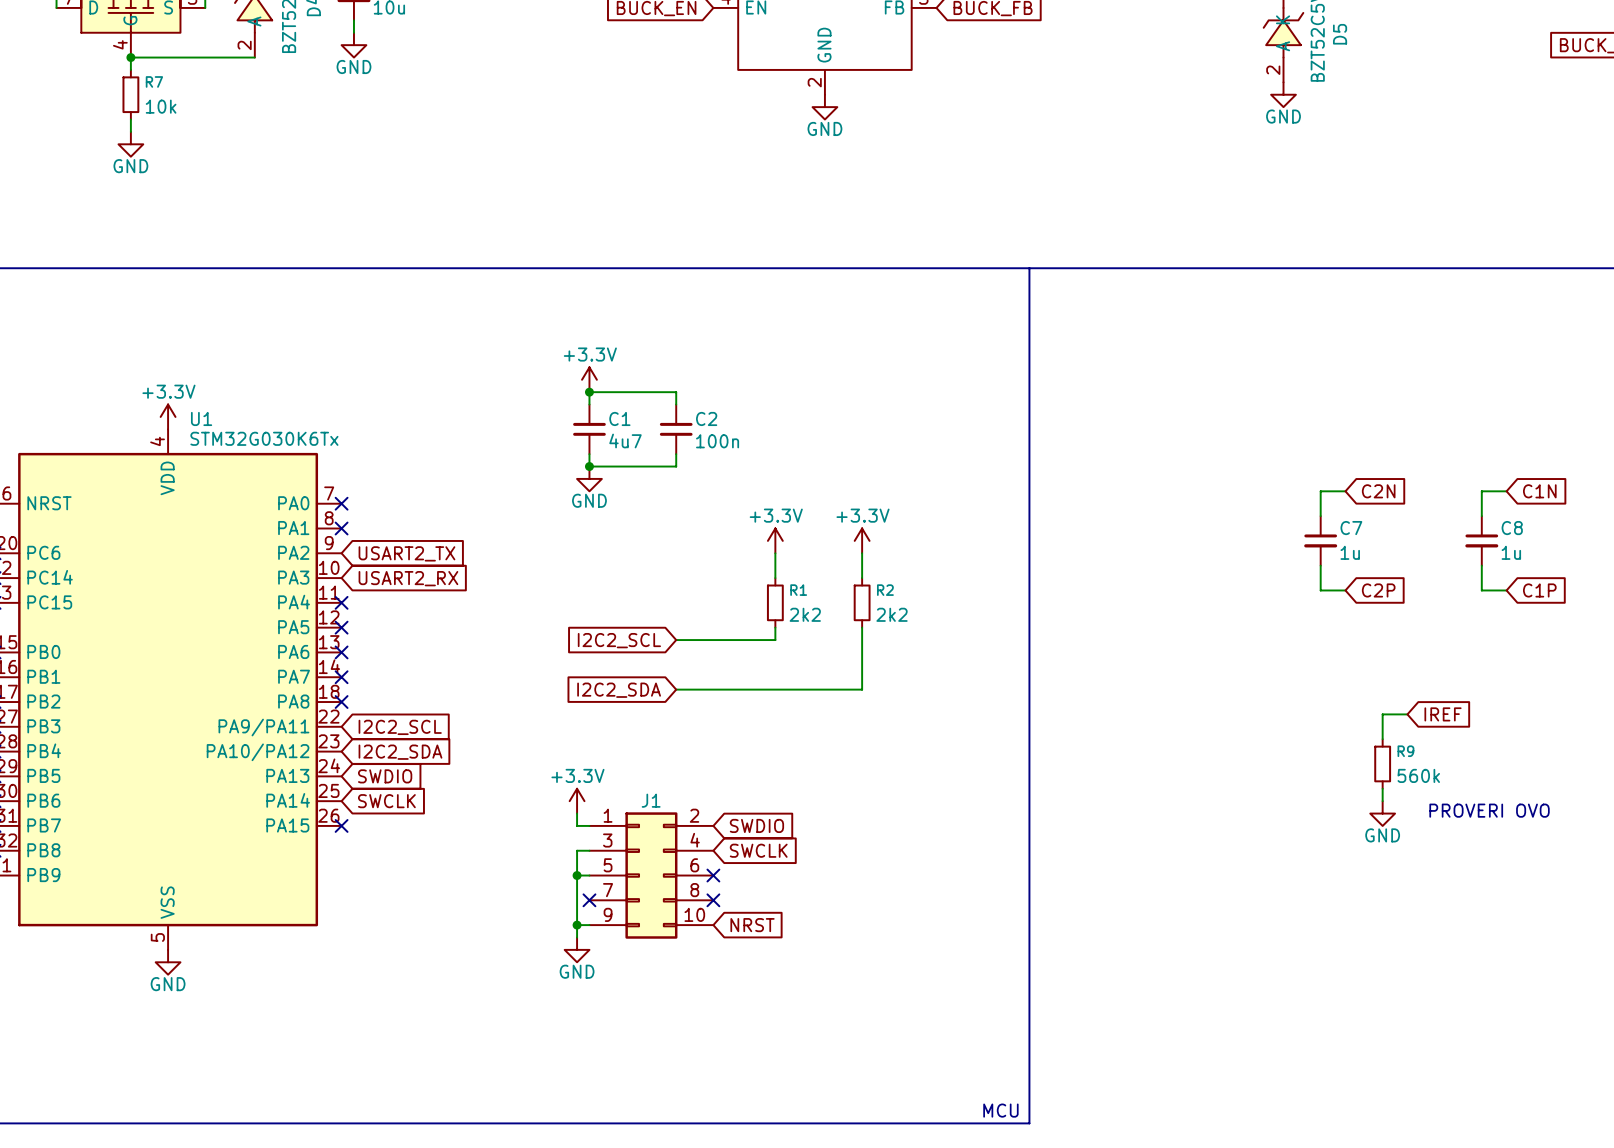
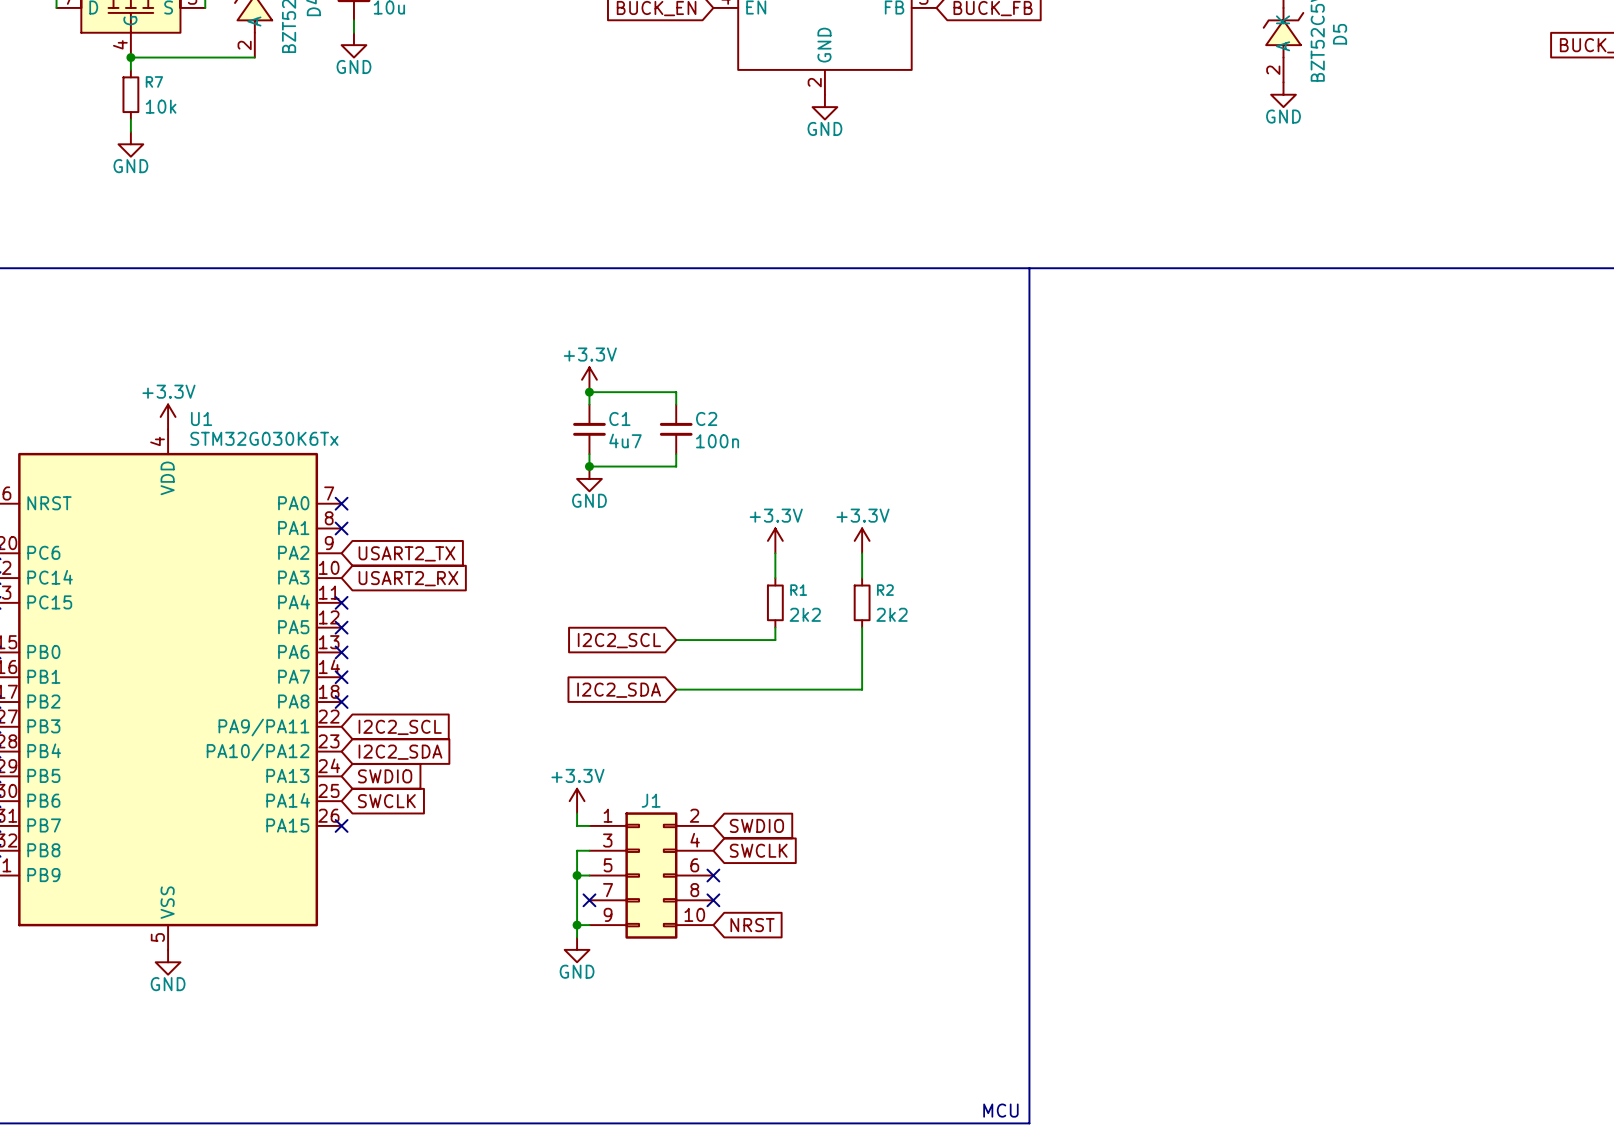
wire: (1345, 491) (1320, 491) (1320, 516) -> none
global label: C2N (1378, 491) -> none
wire: (1506, 491) (1481, 491) (1481, 516) -> none
global label: C1N (1539, 491) -> none
C7: 1u (1320, 540) -> none
C8: 1u (1481, 540) -> none
wire: (1320, 565) (1320, 590) (1345, 590) -> none
wire: (1481, 565) (1481, 590) (1506, 590) -> none
global label: C2P (1378, 590) -> none
global label: C1P (1539, 590) -> none
wire: (1407, 714) (1382, 714) (1382, 739) -> none
global label: IREF (1443, 714) -> none
R9: 560k (1382, 763) -> none
wire: (1382, 788) (1382, 801) -> none
text: PROVERI OVO (1489, 810) -> none
power symbol: GND (1382, 813) -> none

